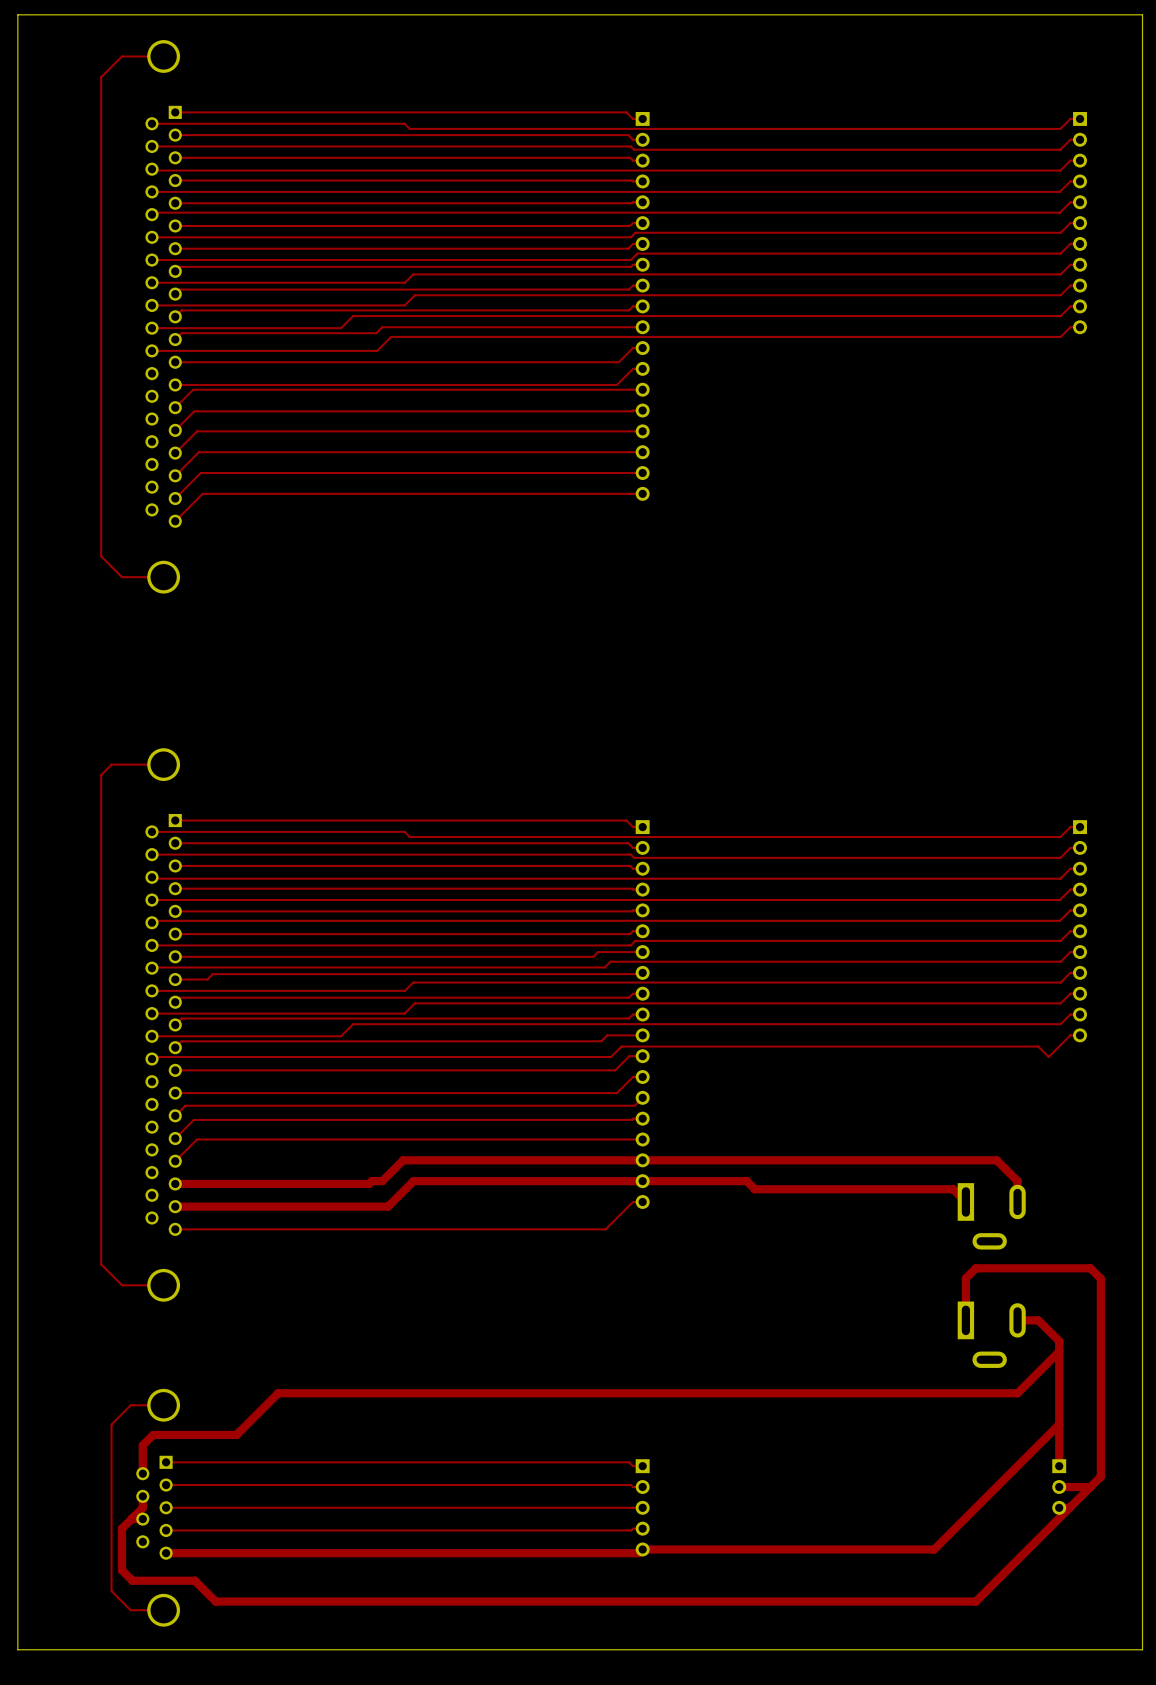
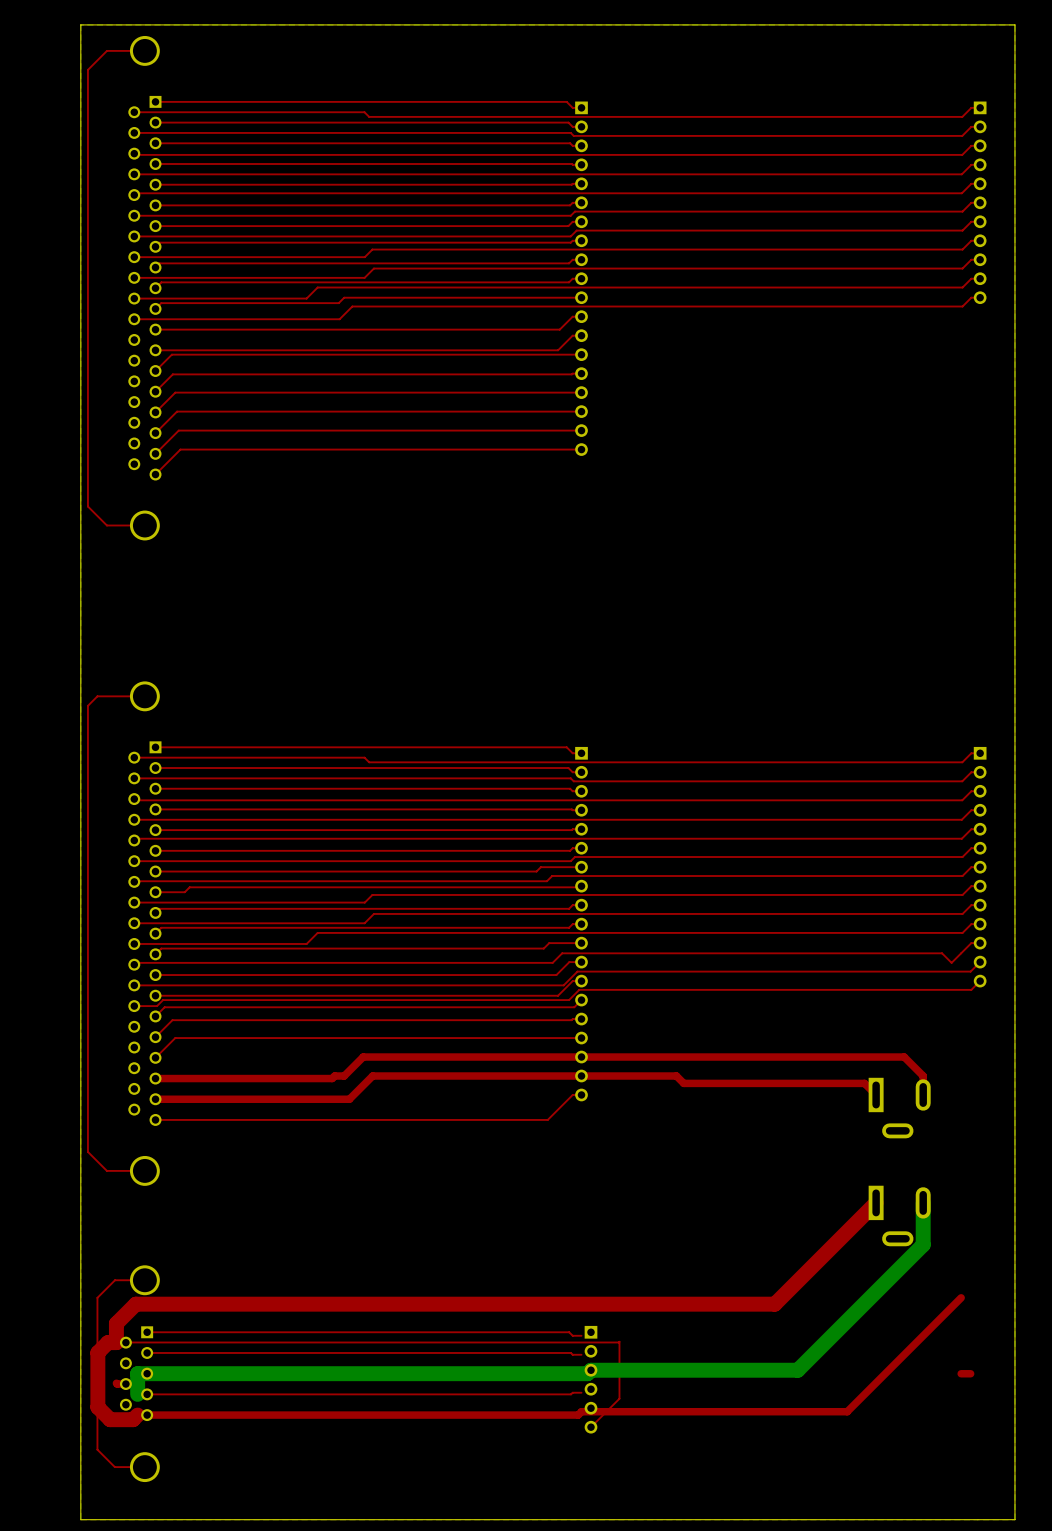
board edge: (1142, 14) (17, 14) (17, 1649) (1142, 1649) (1142, 14) -> (1014, 24) (1014, 1519) (80, 1519) (80, 24) (1014, 24)
part: none -> (980, 867)
top track: none -> (980, 962) (970, 971) (577, 971) (563, 985) (134, 985)
top track: none -> (980, 981) (971, 989) (579, 989) (569, 1000) (163, 1000) (157, 1006) (134, 1006)
top track: (965, 1320) (965, 1278) (975, 1268) (1090, 1268) (1100, 1278) (1100, 1476) (975, 1601) (215, 1601) (194, 1580) (132, 1580) (121, 1570) (121, 1528) (142, 1507) (142, 1496) -> (876, 1202) (774, 1304) (135, 1304) (116, 1323) (116, 1342)
top track: (1017, 1320) (1038, 1320) (1059, 1341) (1059, 1466) -> none
bottom track: none -> (923, 1202) (923, 1244) (797, 1370) (591, 1370) (587, 1373) (137, 1373) (137, 1394)
top track: (1059, 1351) (1017, 1393) (278, 1393) (236, 1434) (153, 1434) (142, 1445) (142, 1473) -> none
top track: none -> (116, 1342) (619, 1341) (619, 1398) (591, 1427)
top track: none -> (116, 1342) (107, 1342) (97, 1352) (97, 1407) (110, 1419) (133, 1419) (137, 1415) (147, 1415)
part: (1059, 1487) -> none
top track: (1090, 1487) (1059, 1487) -> none
top track: (632, 1507) (166, 1507) -> none
part: (642, 1507) -> none
part: none -> (591, 1379)

